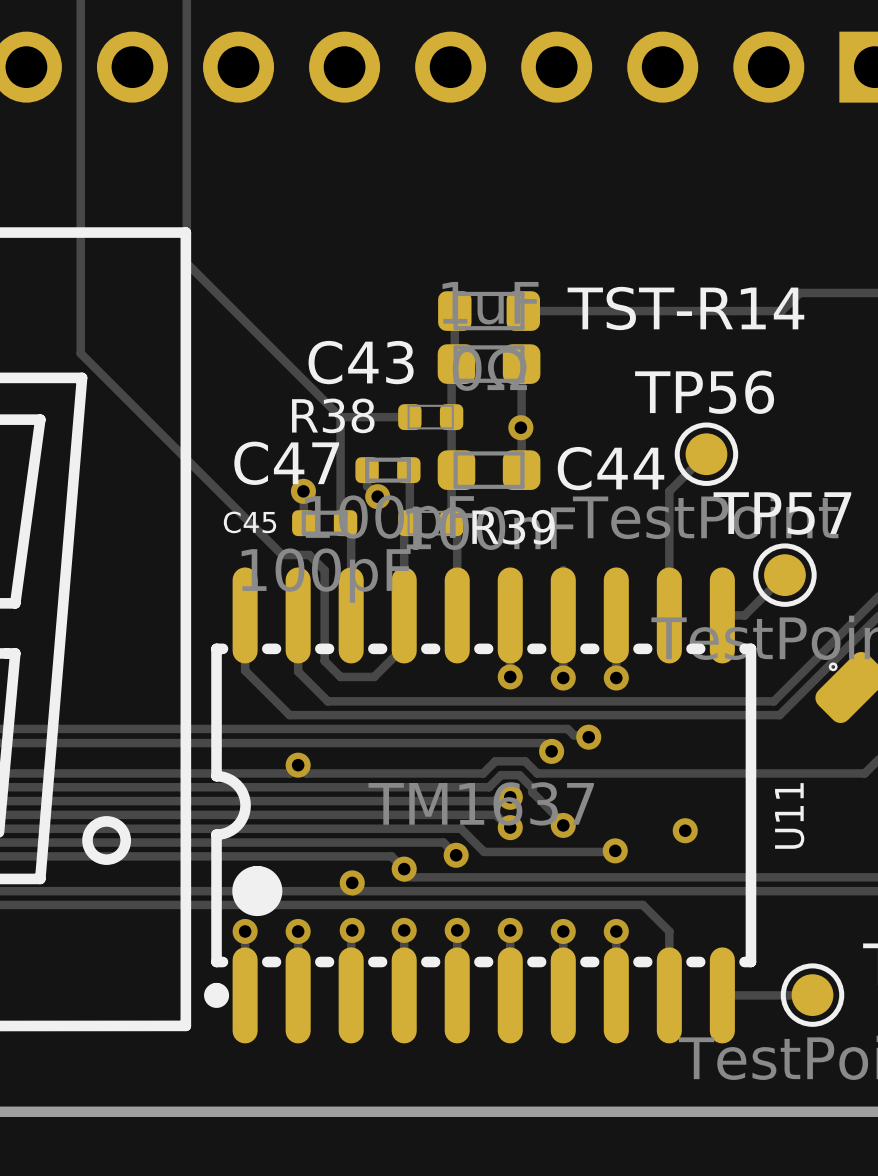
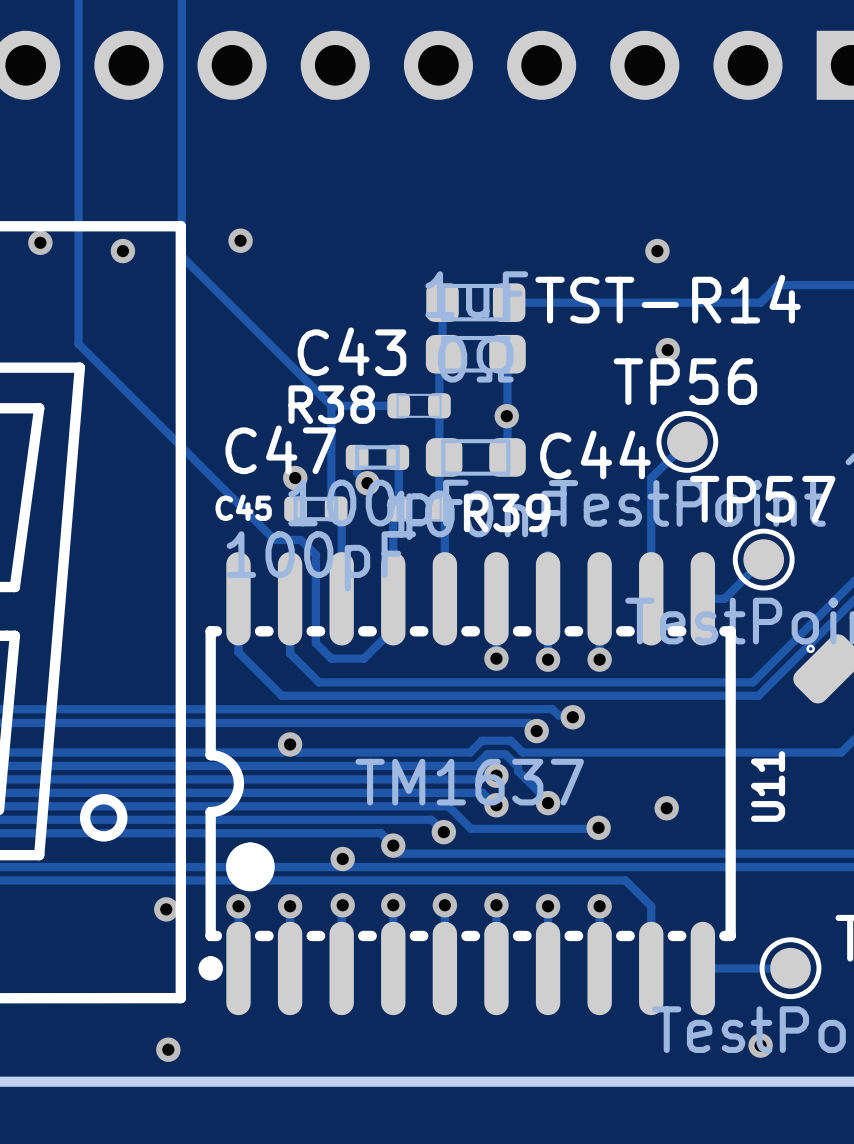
via: none -> (240, 240)
via: none -> (40, 242)
via: none -> (122, 251)
via: none -> (657, 251)
via: none -> (667, 350)
via: none -> (166, 909)
via: none -> (760, 1045)
via: none -> (168, 1049)

